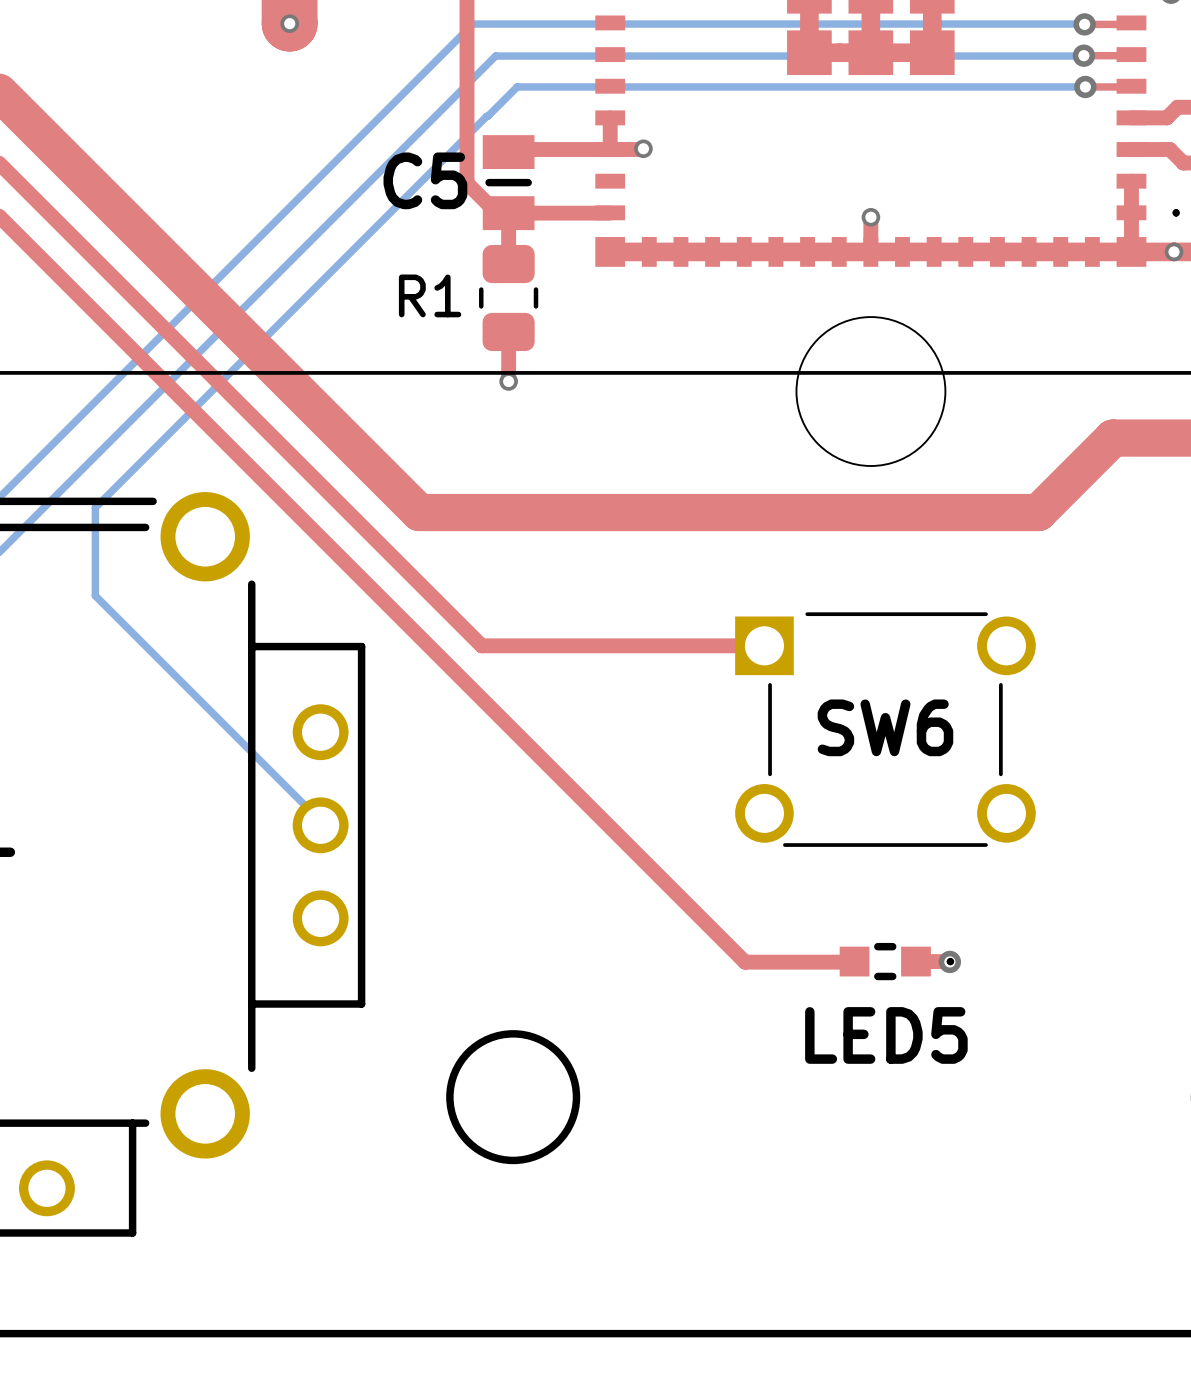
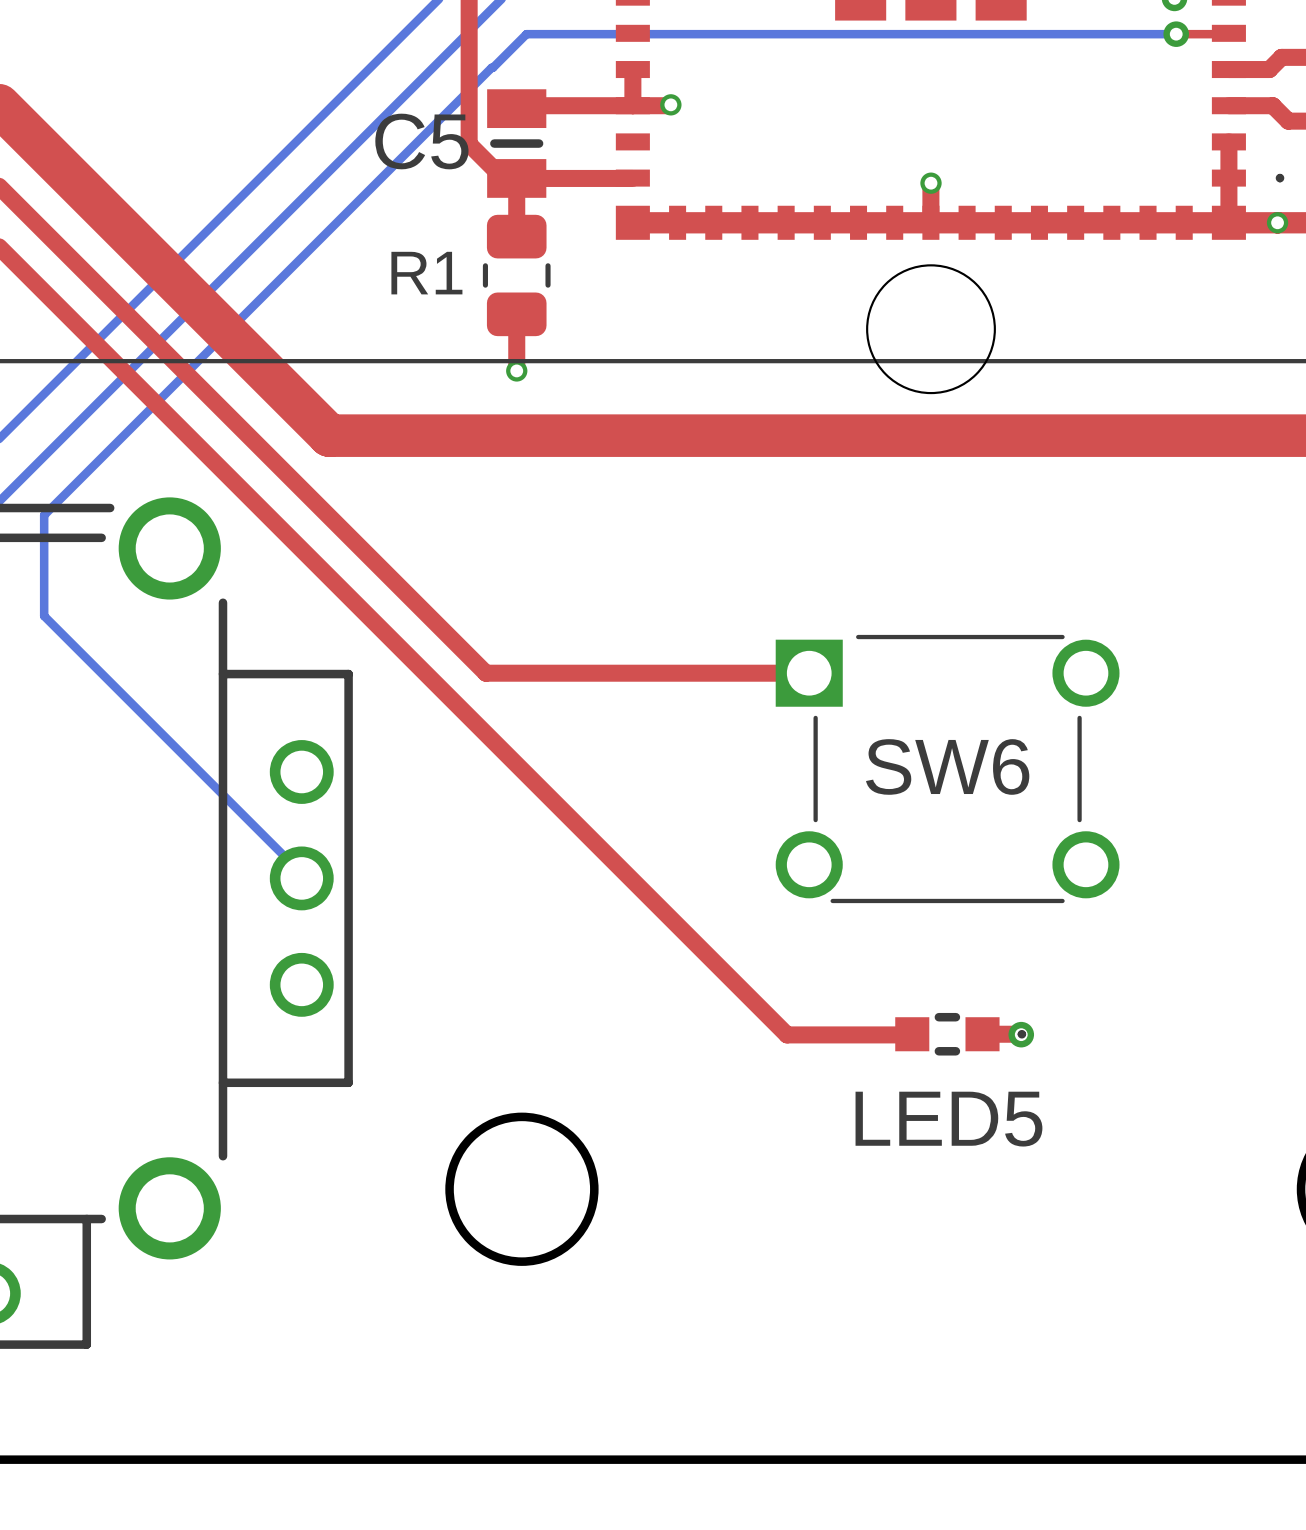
round board edge: none -> [866, 264, 996, 395]
round board edge: [795, 316, 947, 467] -> none
top track: (344, 438) (419, 512) (1038, 512) (1112, 438) -> (329, 435) (1207, 435)

